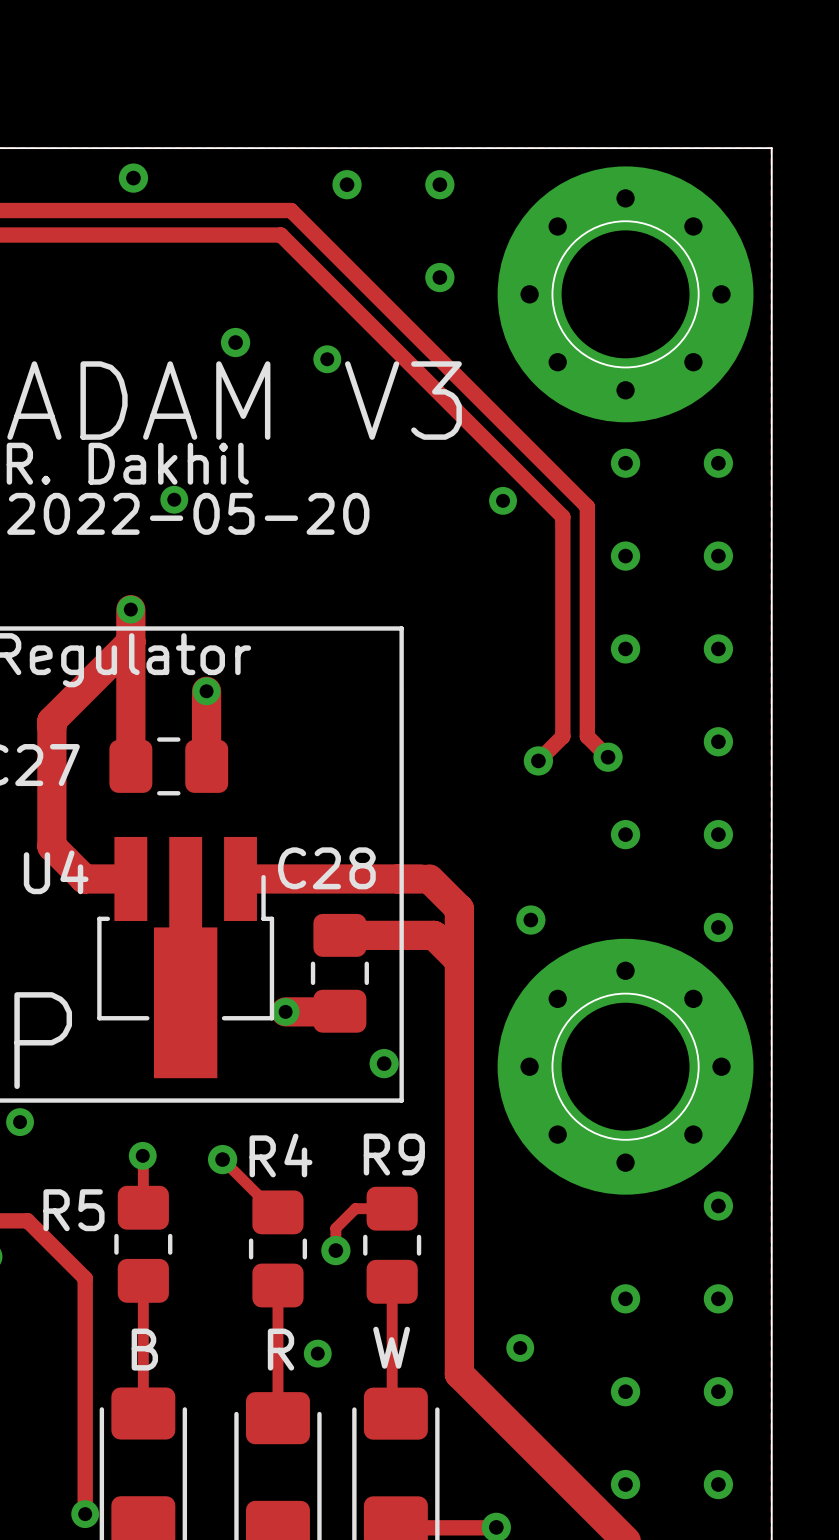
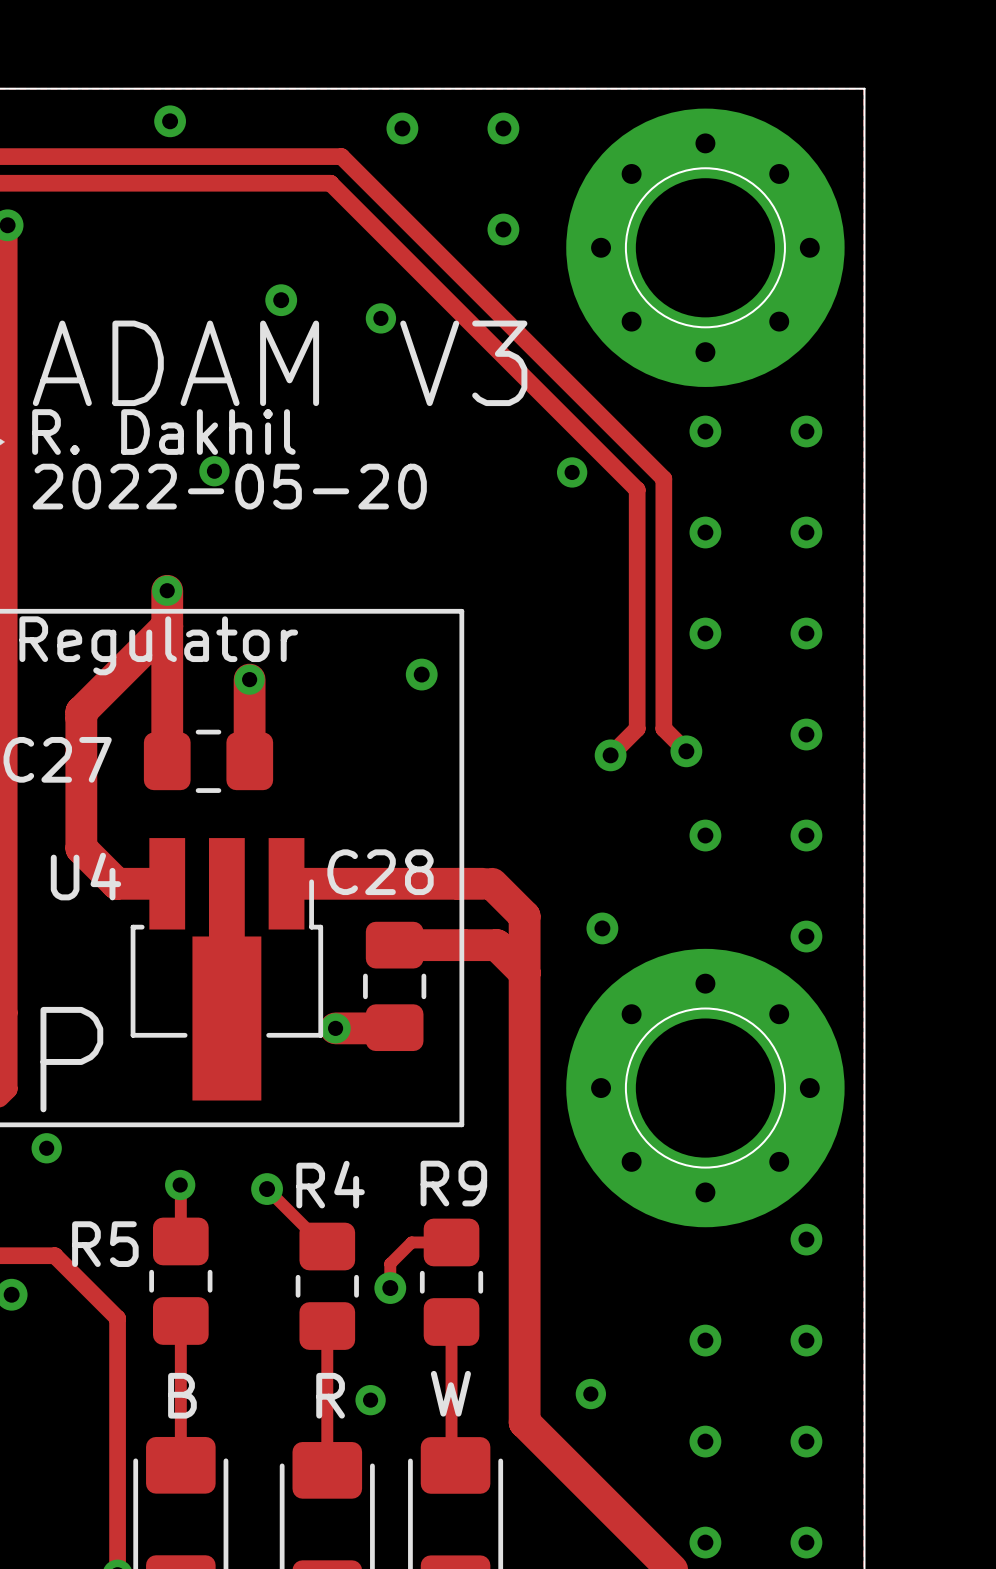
via: none -> (421, 674)
via: (384, 1063) -> none

